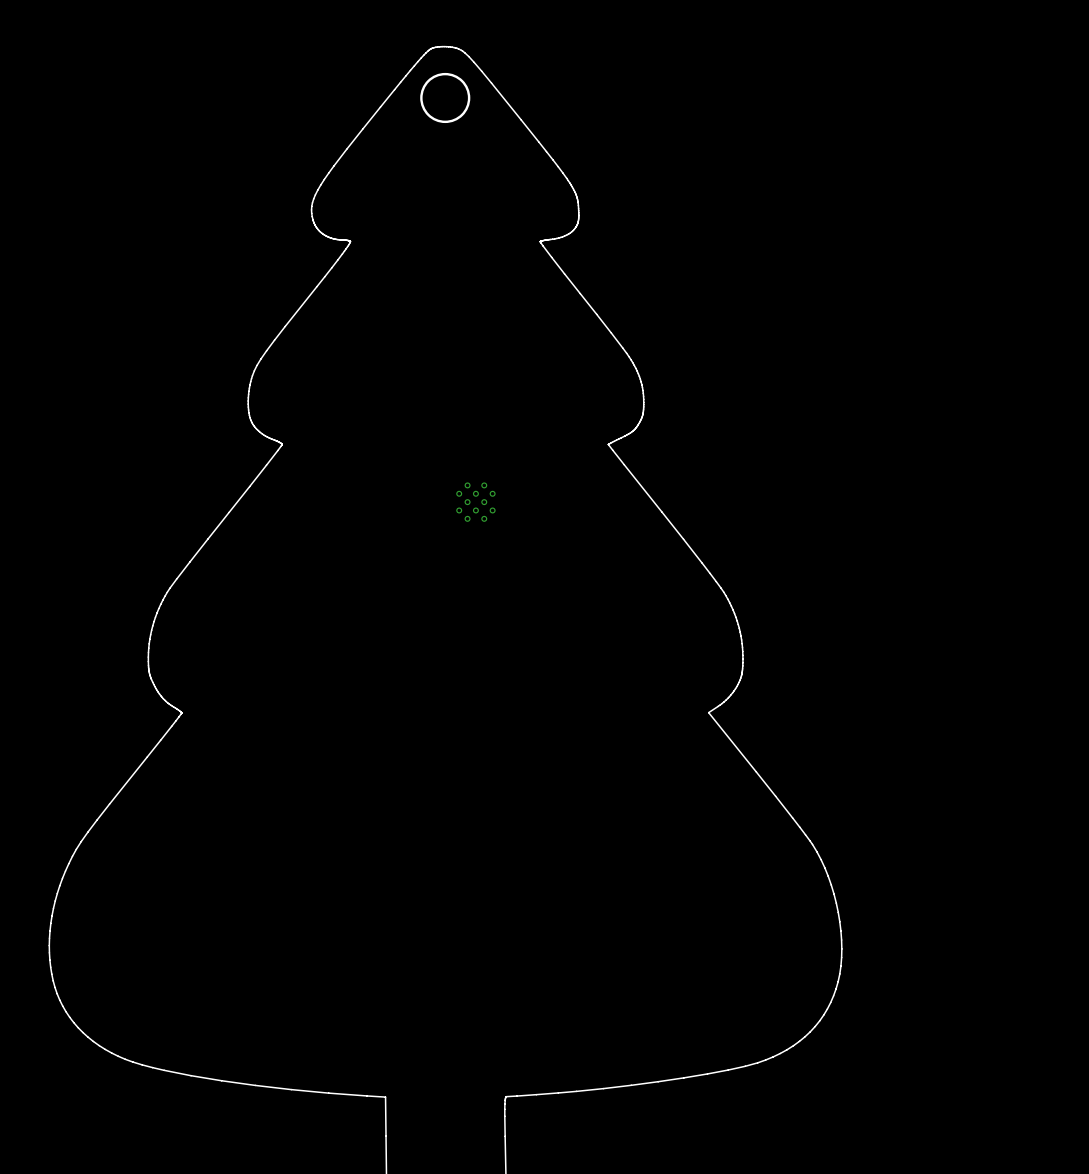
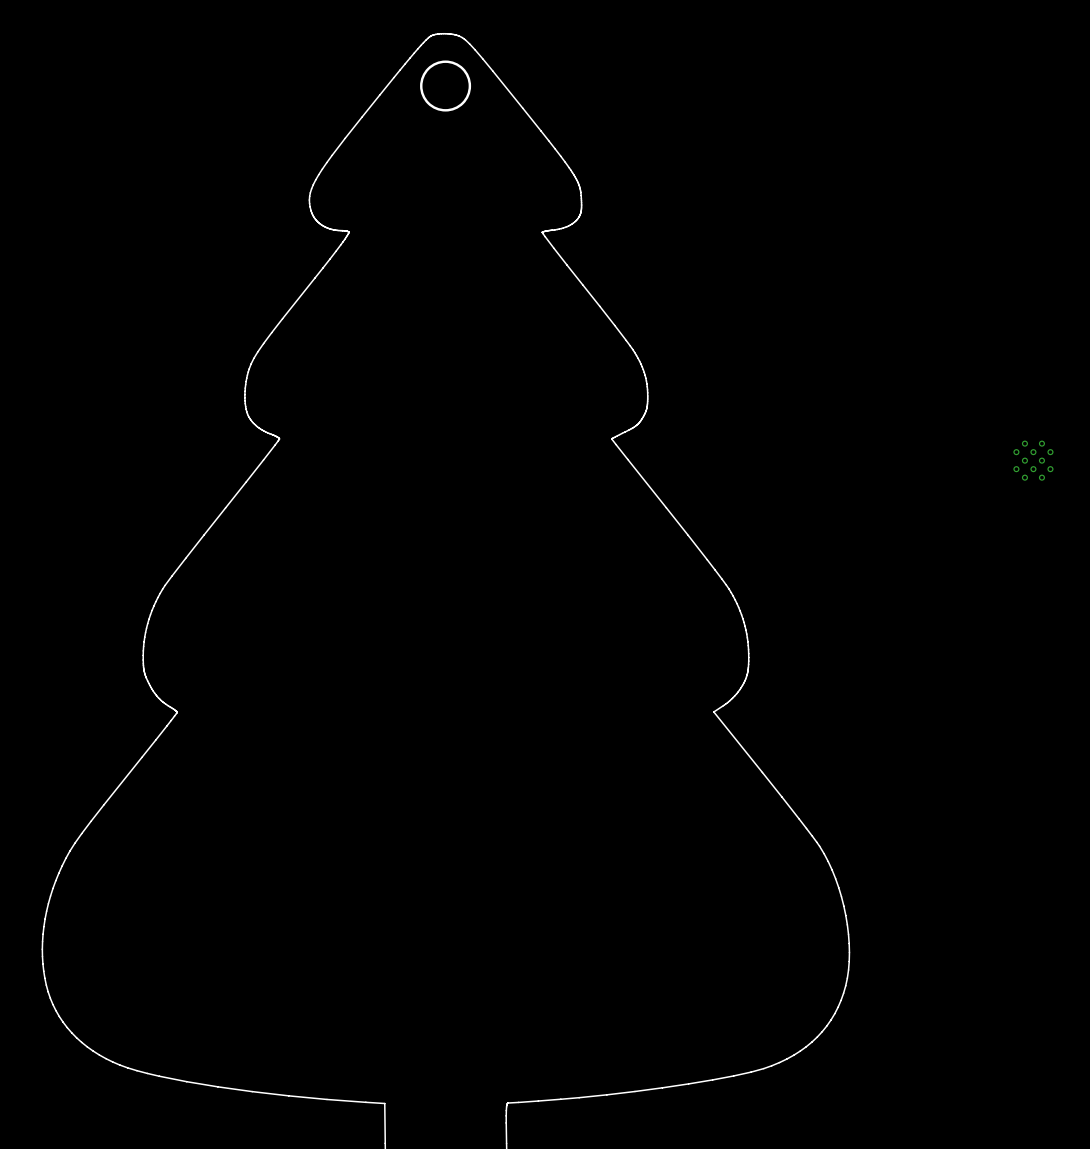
part: none -> (1033, 460)
part: (475, 502) -> none

